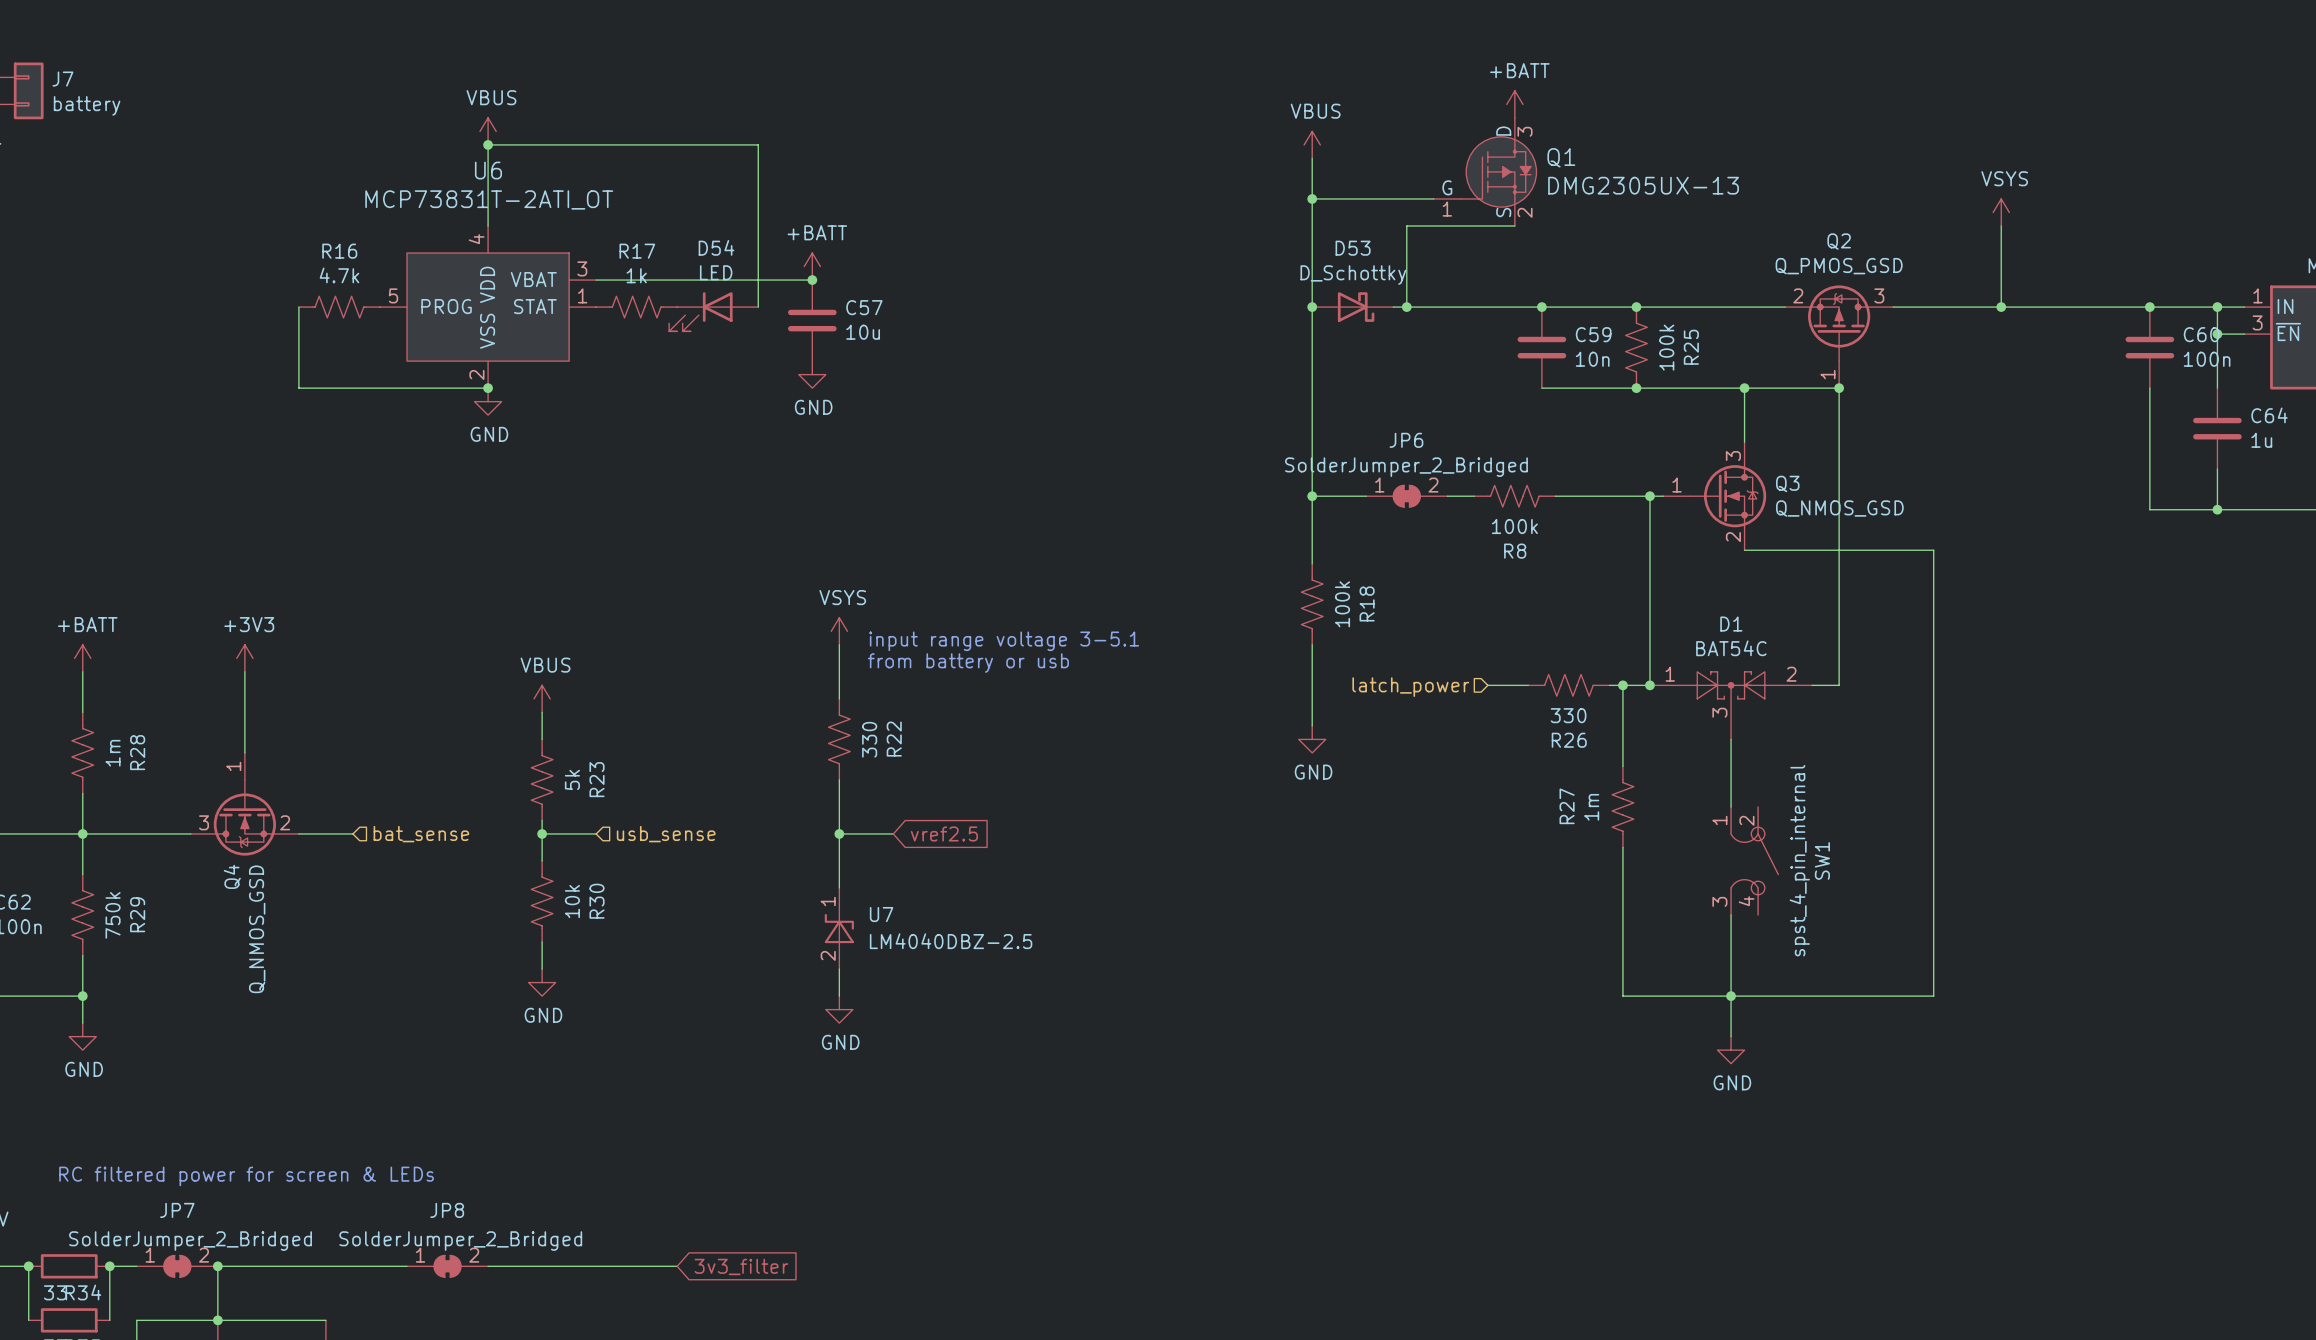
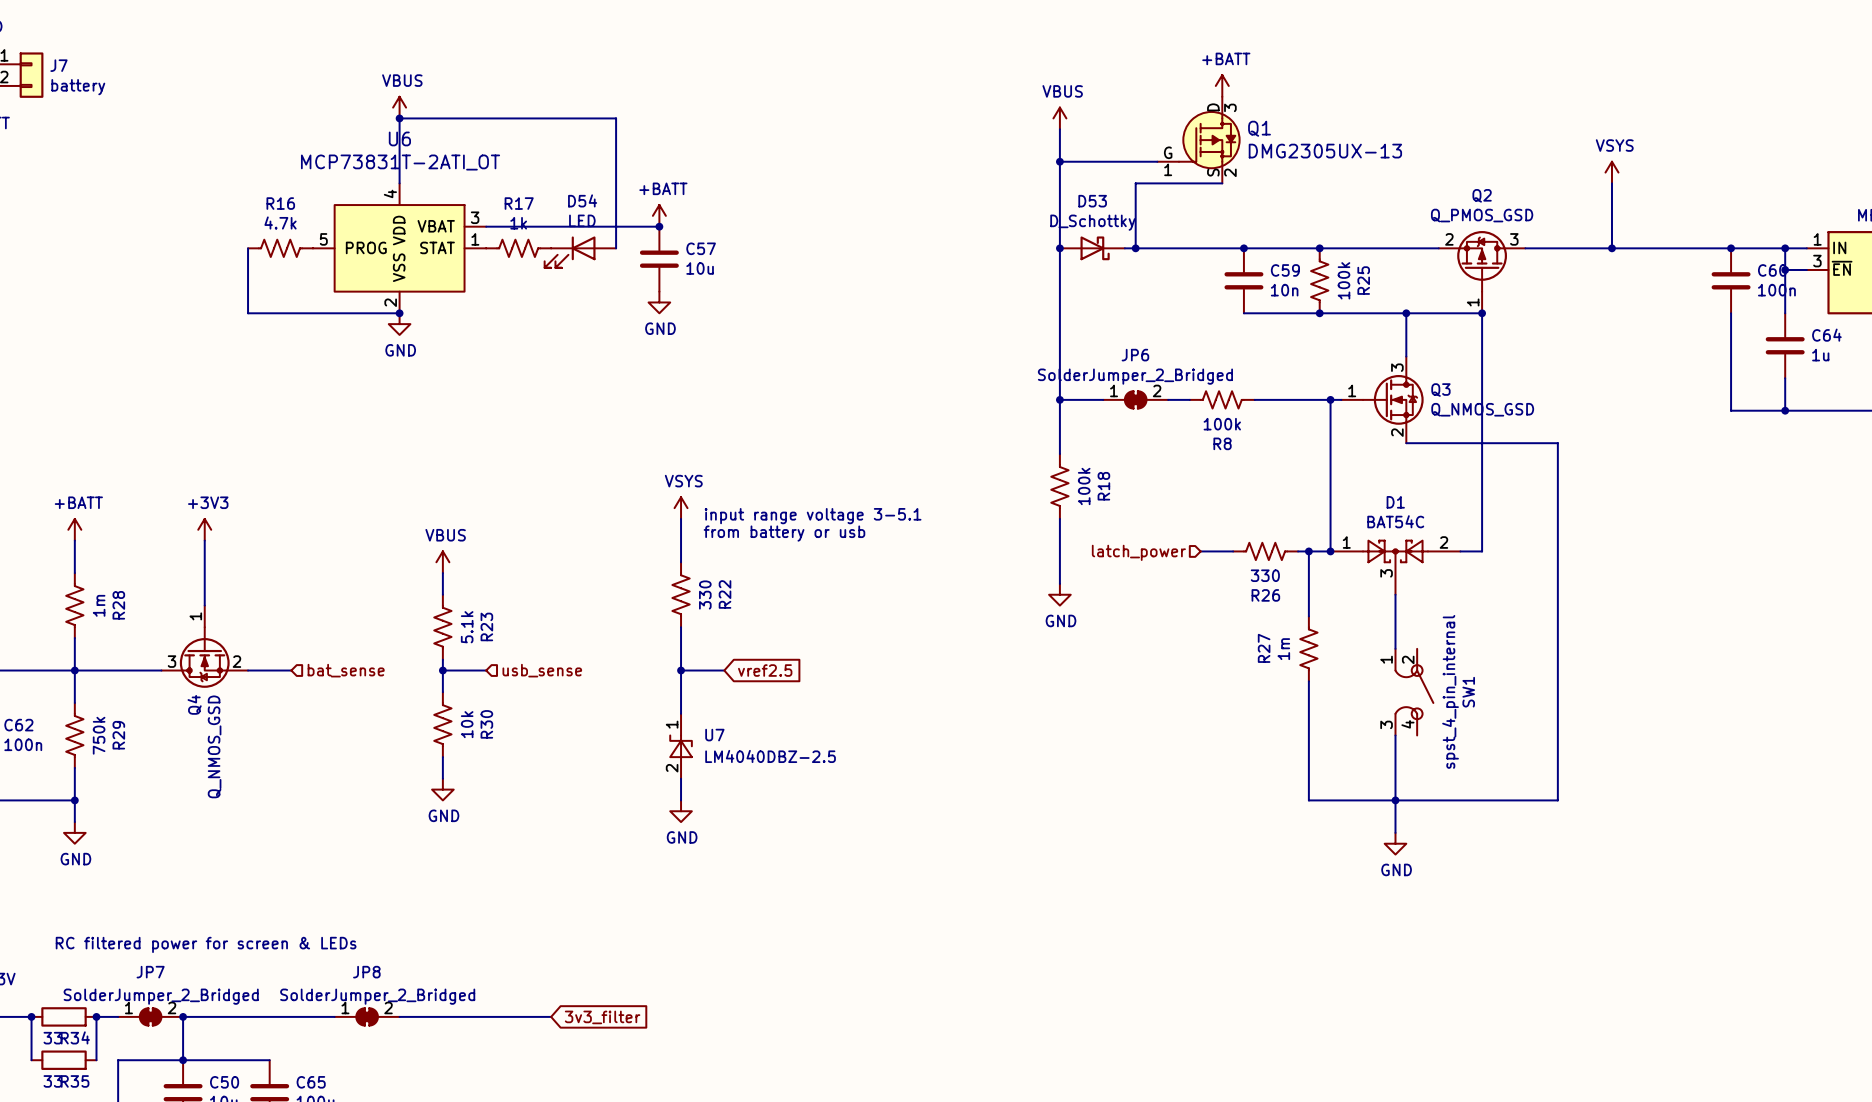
R23 value: 5k (572, 779) -> 5.1k (467, 627)

